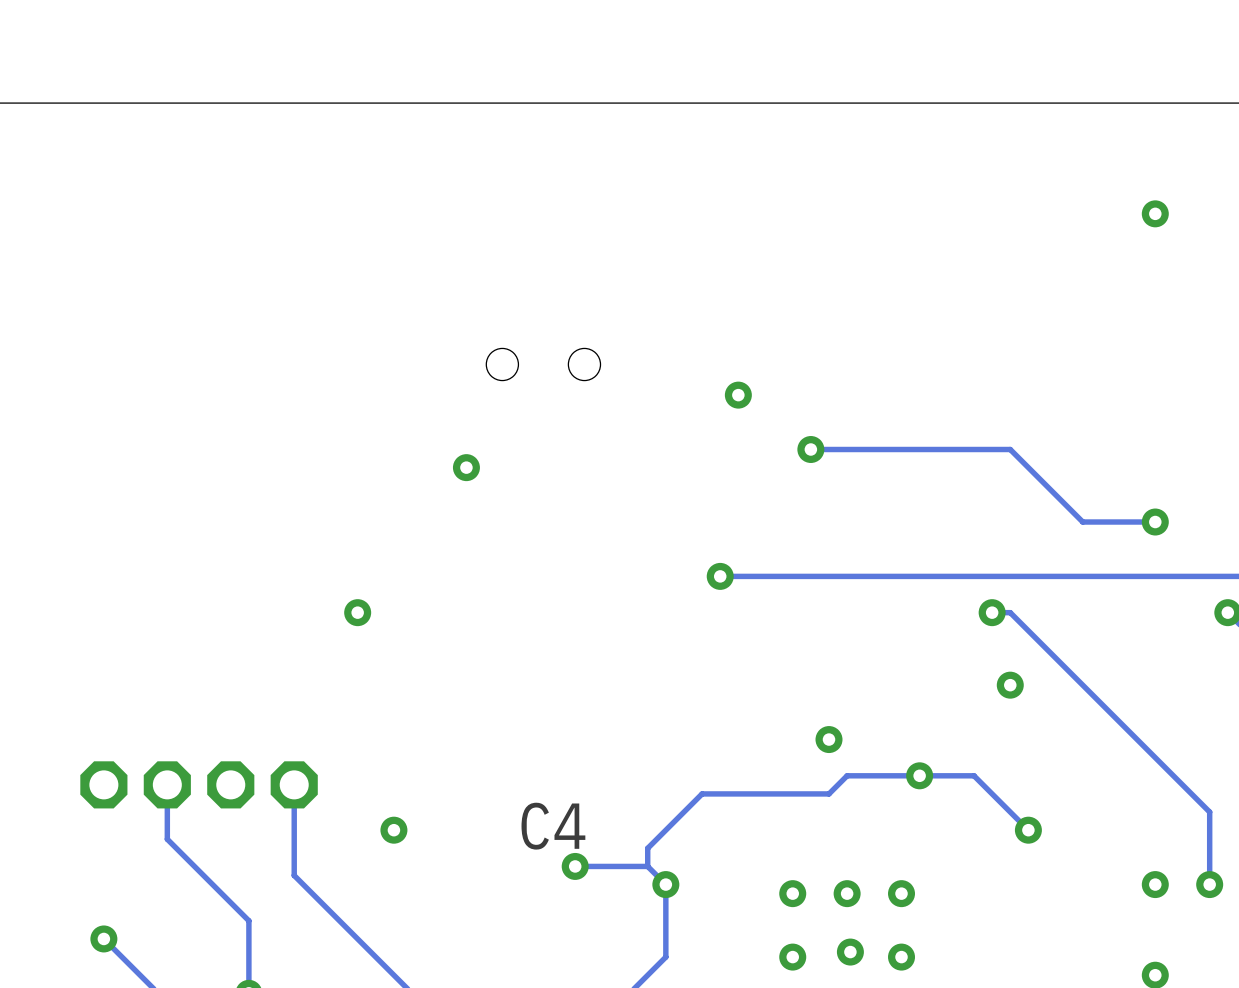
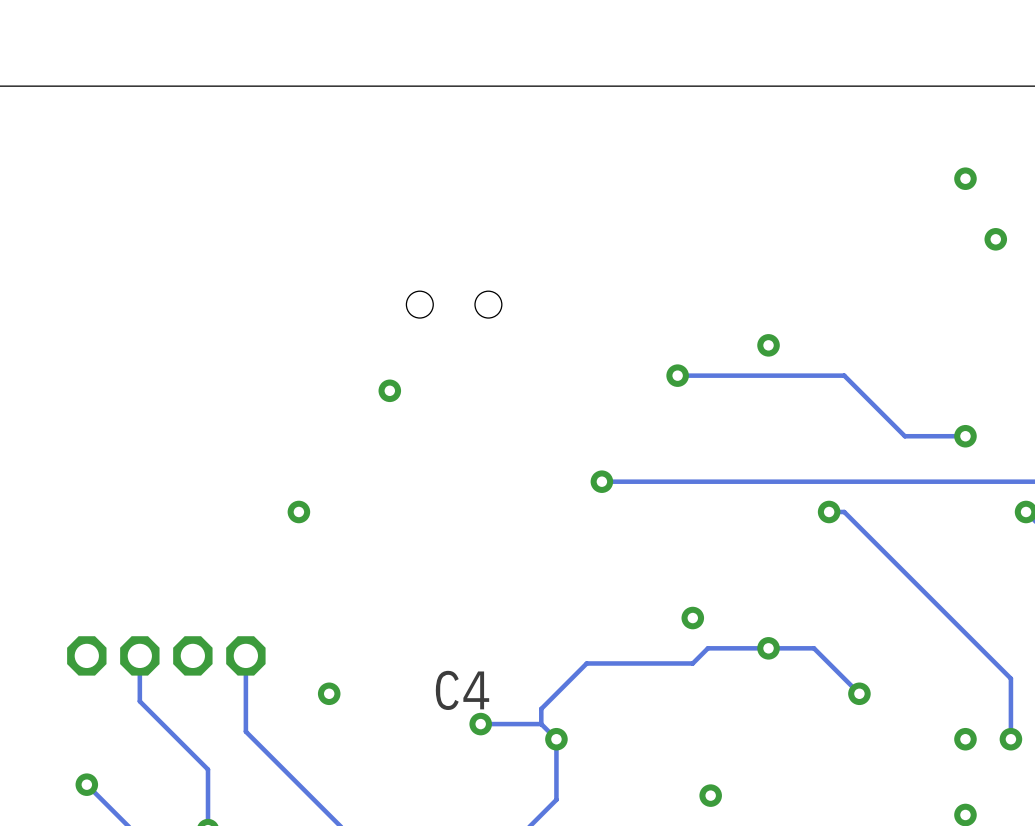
via: none -> (995, 239)
via: (738, 395) -> none
via: none -> (768, 345)
via: (1010, 685) -> none
via: (792, 893) -> none
via: (847, 893) -> none
via: (901, 893) -> none
via: (792, 957) -> none
via: (901, 957) -> none

